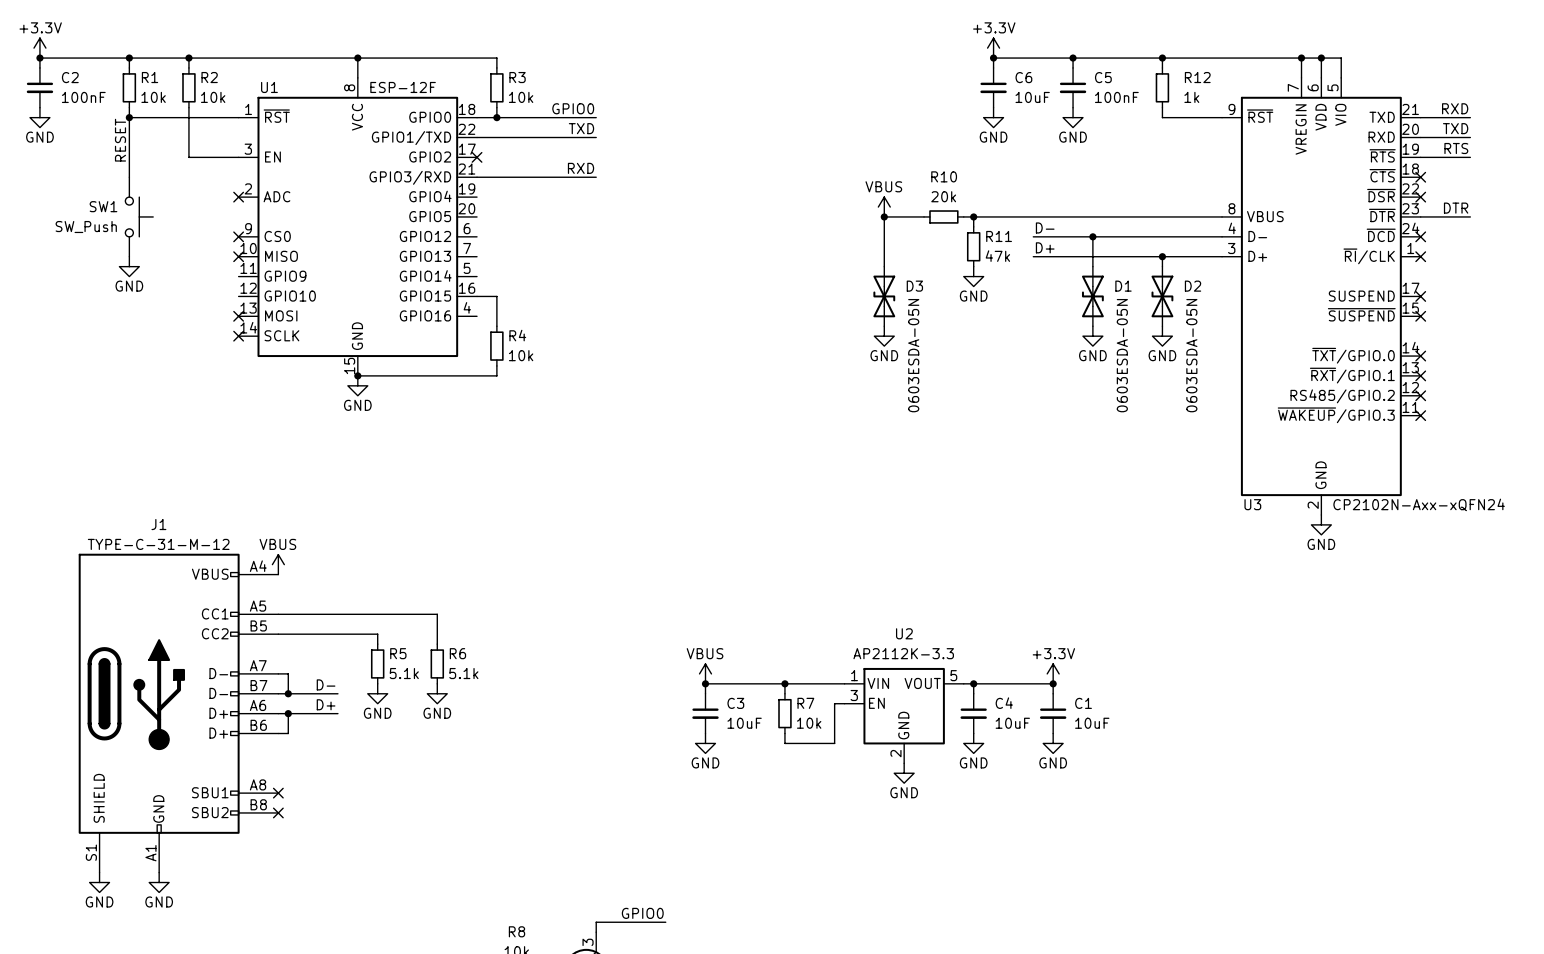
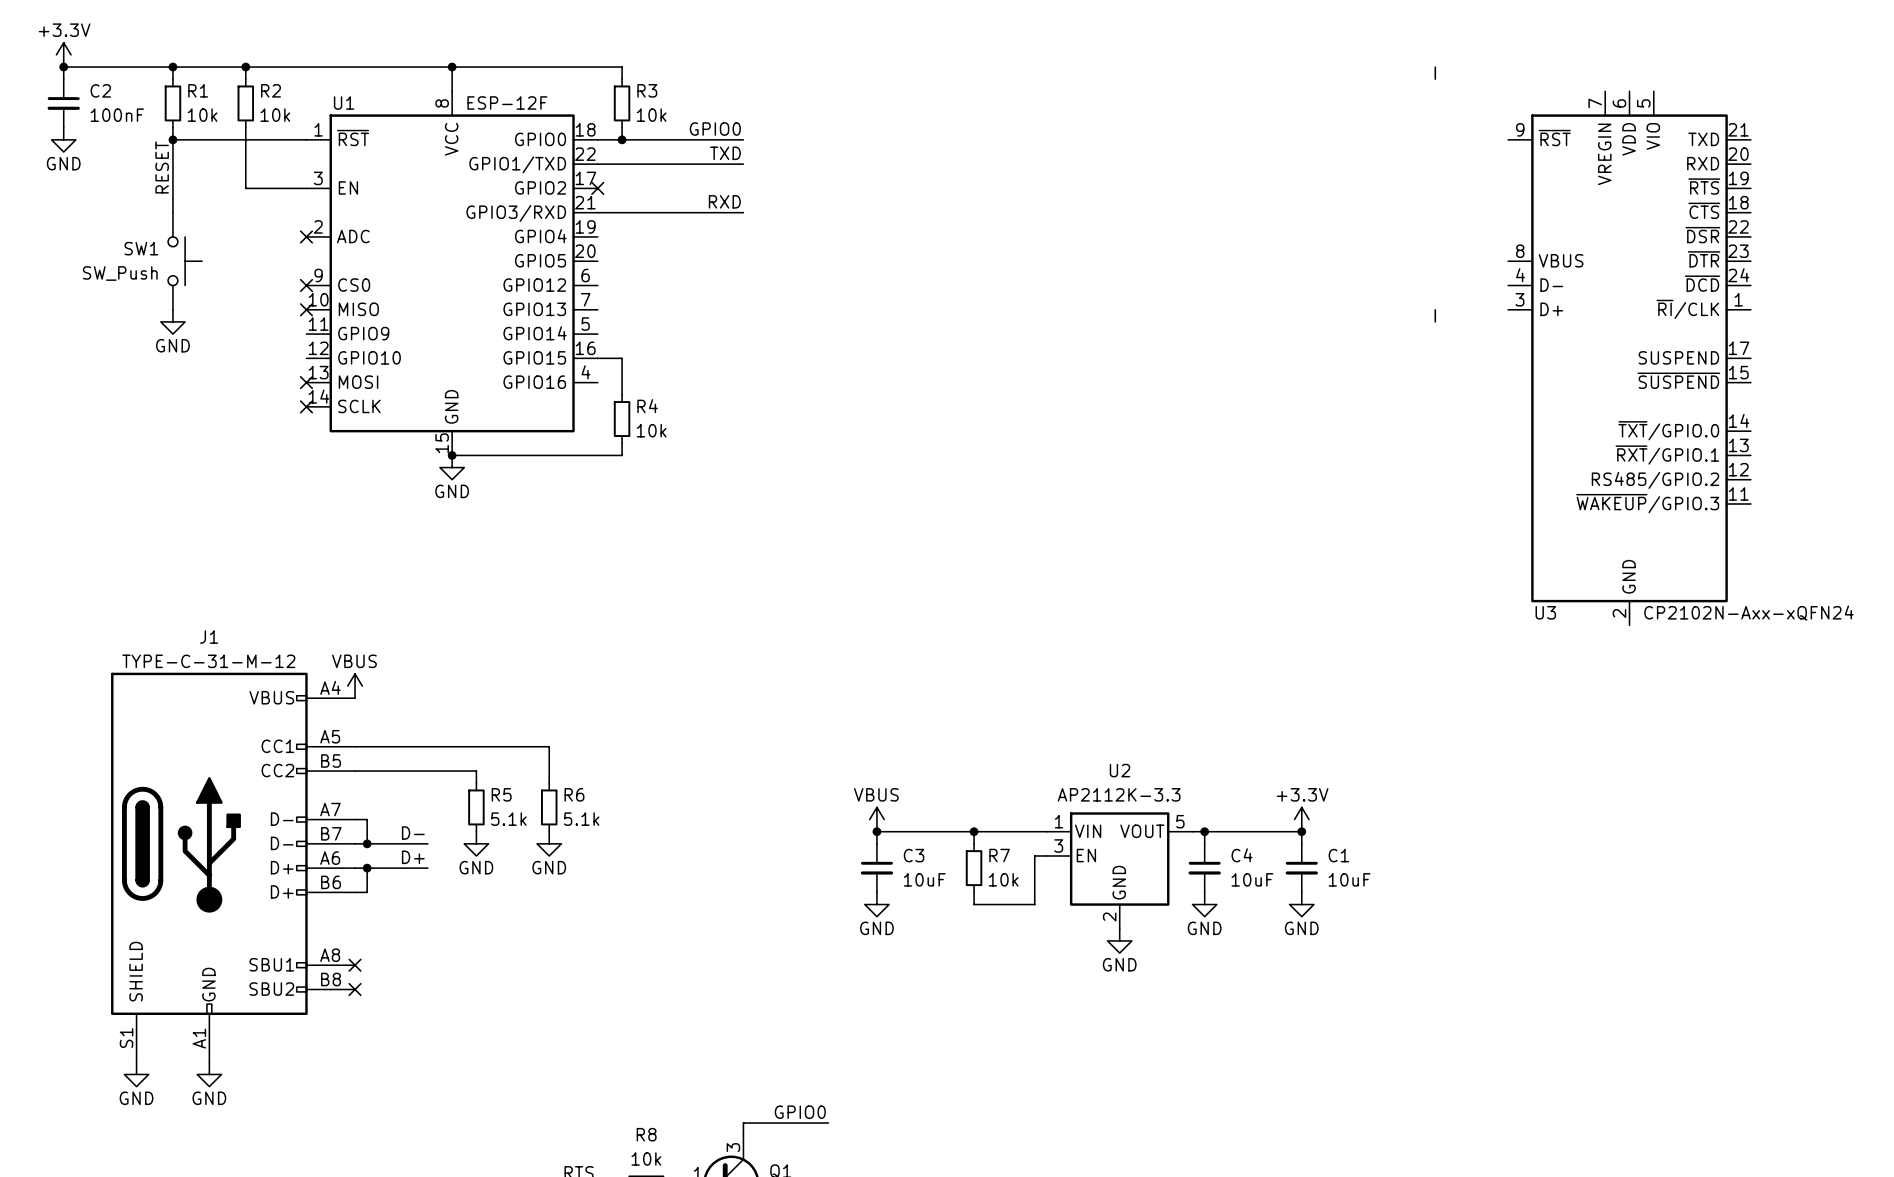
power symbol: +3.3V (993, 48) -> none
junction: (993, 58) -> none
wire: (1073, 58) (1073, 67) -> none
junction: (1073, 58) -> none
junction: (1162, 58) -> none
wire: (1301, 58) (1301, 77) -> none
junction: (1301, 58) -> none
wire: (1321, 58) (1321, 77) -> none
junction: (1321, 58) -> none
wire: (993, 67) (993, 58) (1341, 58) (1341, 77) -> none
C6: 10uF (993, 87) -> none
C5: 100nF (1073, 87) -> none
R12: 1k (1162, 87) -> none
wire: (1162, 107) (1162, 117) (1222, 117) -> none
label: RXD (1455, 108) -> none
power symbol: GND (993, 117) -> none
power symbol: GND (1073, 117) -> none
wire: (1420, 117) (1470, 117) -> none
label: TXD (1455, 128) -> none
wire: (1420, 137) (1470, 137) -> none
label: RTS (1456, 148) -> none
wire: (1420, 157) (1470, 157) -> none
no-connect mark: (1420, 177) -> none
no-connect mark: (1420, 197) -> none
power symbol: VBUS (884, 207) -> none
label: DTR (1456, 208) -> none
junction: (884, 216) -> none
wire: (924, 216) (884, 216) (884, 266) -> none
R10: 20k (943, 216) -> none
wire: (963, 216) (1222, 216) -> none
wire: (973, 216) (973, 226) -> none
junction: (973, 216) -> none
wire: (1420, 216) (1470, 216) -> none
label: D- (1045, 227) -> none
wire: (1033, 236) (1222, 236) -> none
wire: (1092, 236) (1092, 266) -> none
junction: (1092, 236) -> none
no-connect mark: (1420, 236) -> none
R11: 47k (973, 246) -> none
label: D+ (1045, 247) -> none
wire: (1033, 256) (1222, 256) -> none
junction: (1162, 256) -> none
no-connect mark: (1420, 256) -> none
power symbol: GND (973, 276) -> none
D3: 0603ESDA-05N (884, 296) -> none
D1: 0603ESDA-05N (1092, 296) -> none
D2: 0603ESDA-05N (1162, 296) -> none
no-connect mark: (1420, 296) -> none
no-connect mark: (1420, 316) -> none
power symbol: GND (884, 336) -> none
power symbol: GND (1092, 336) -> none
power symbol: GND (1162, 336) -> none
no-connect mark: (1420, 356) -> none
no-connect mark: (1420, 375) -> none
no-connect mark: (1420, 395) -> none
no-connect mark: (1420, 415) -> none
power symbol: GND (1321, 524) -> none

